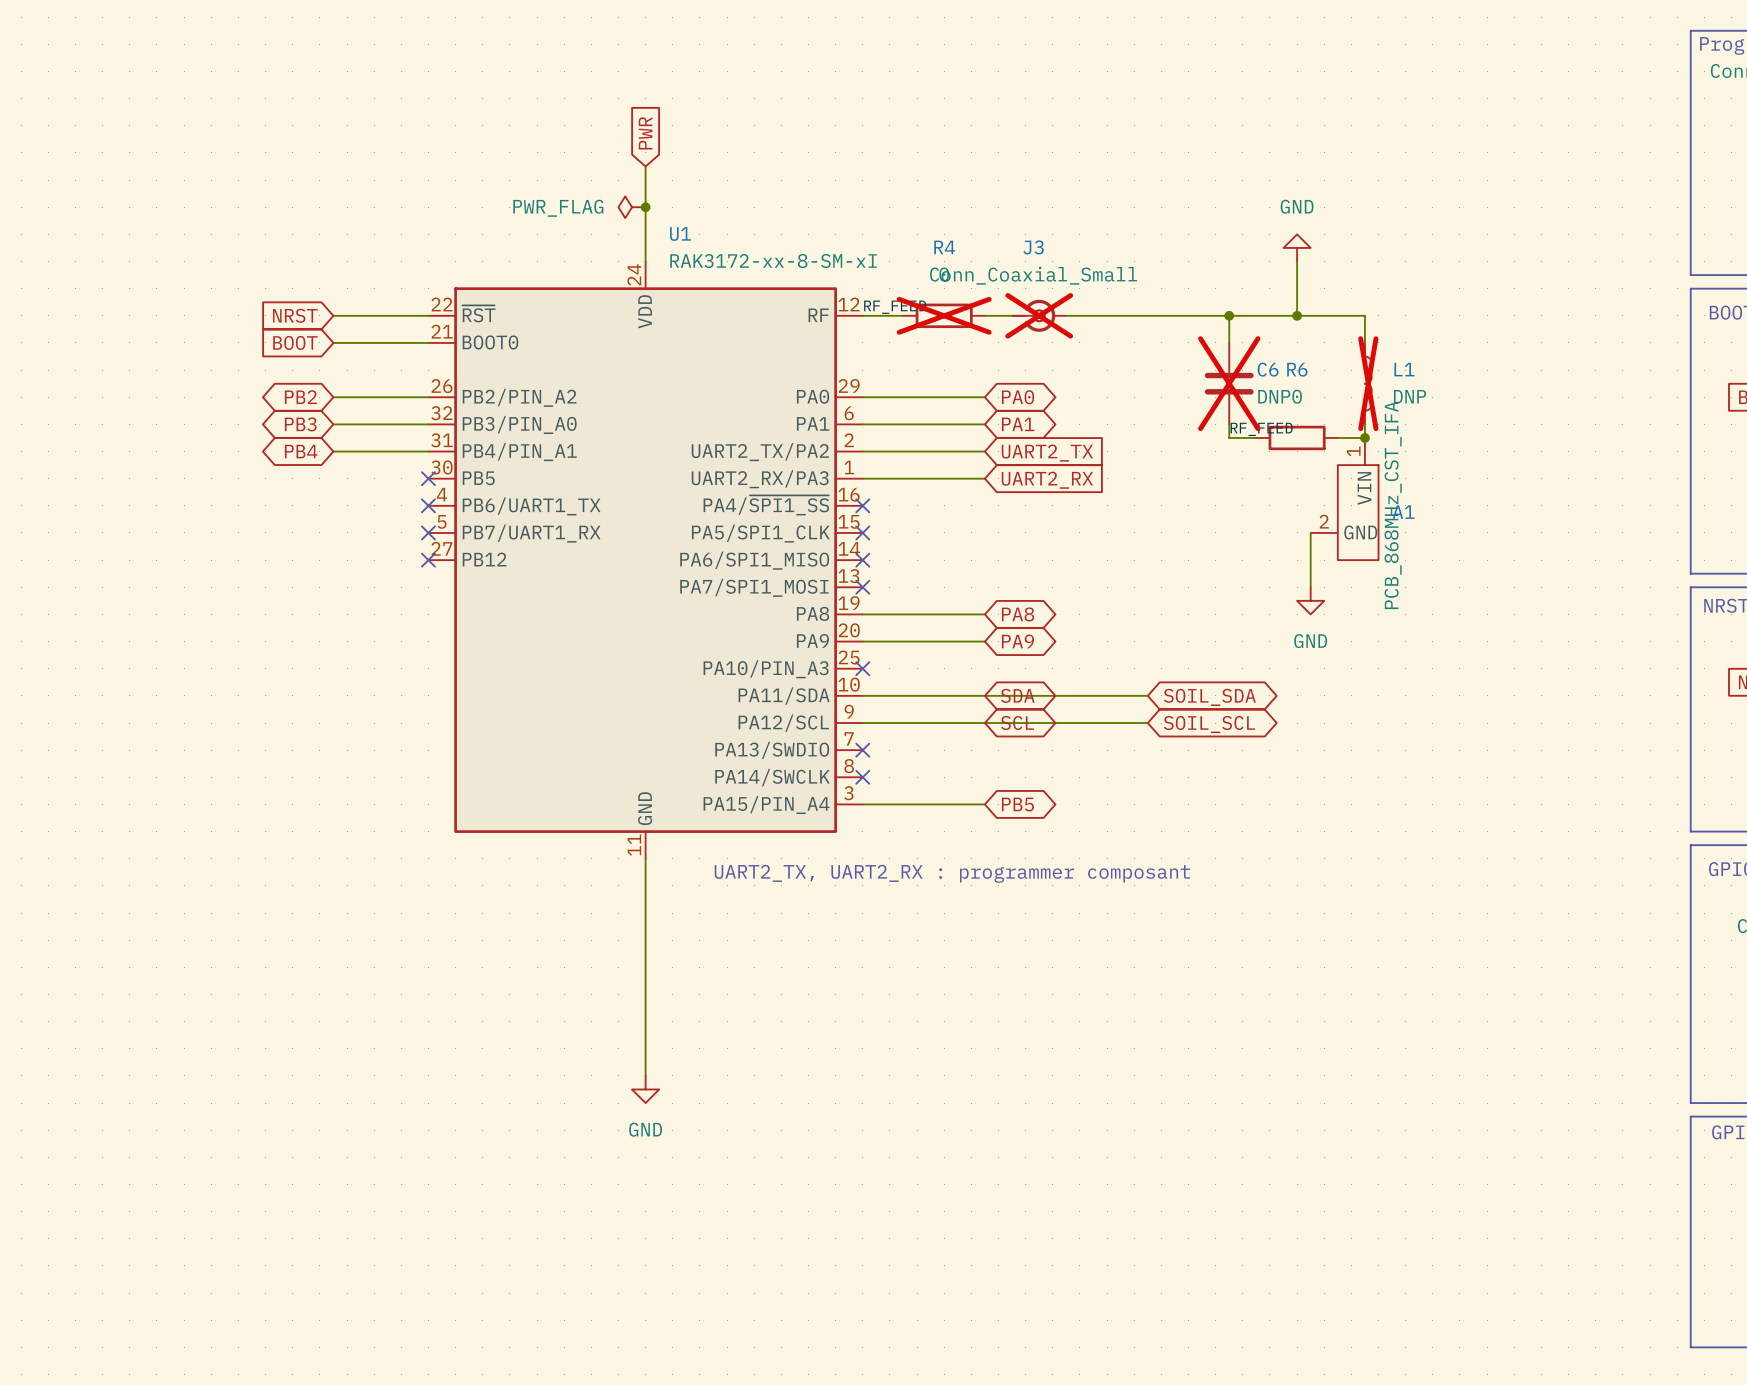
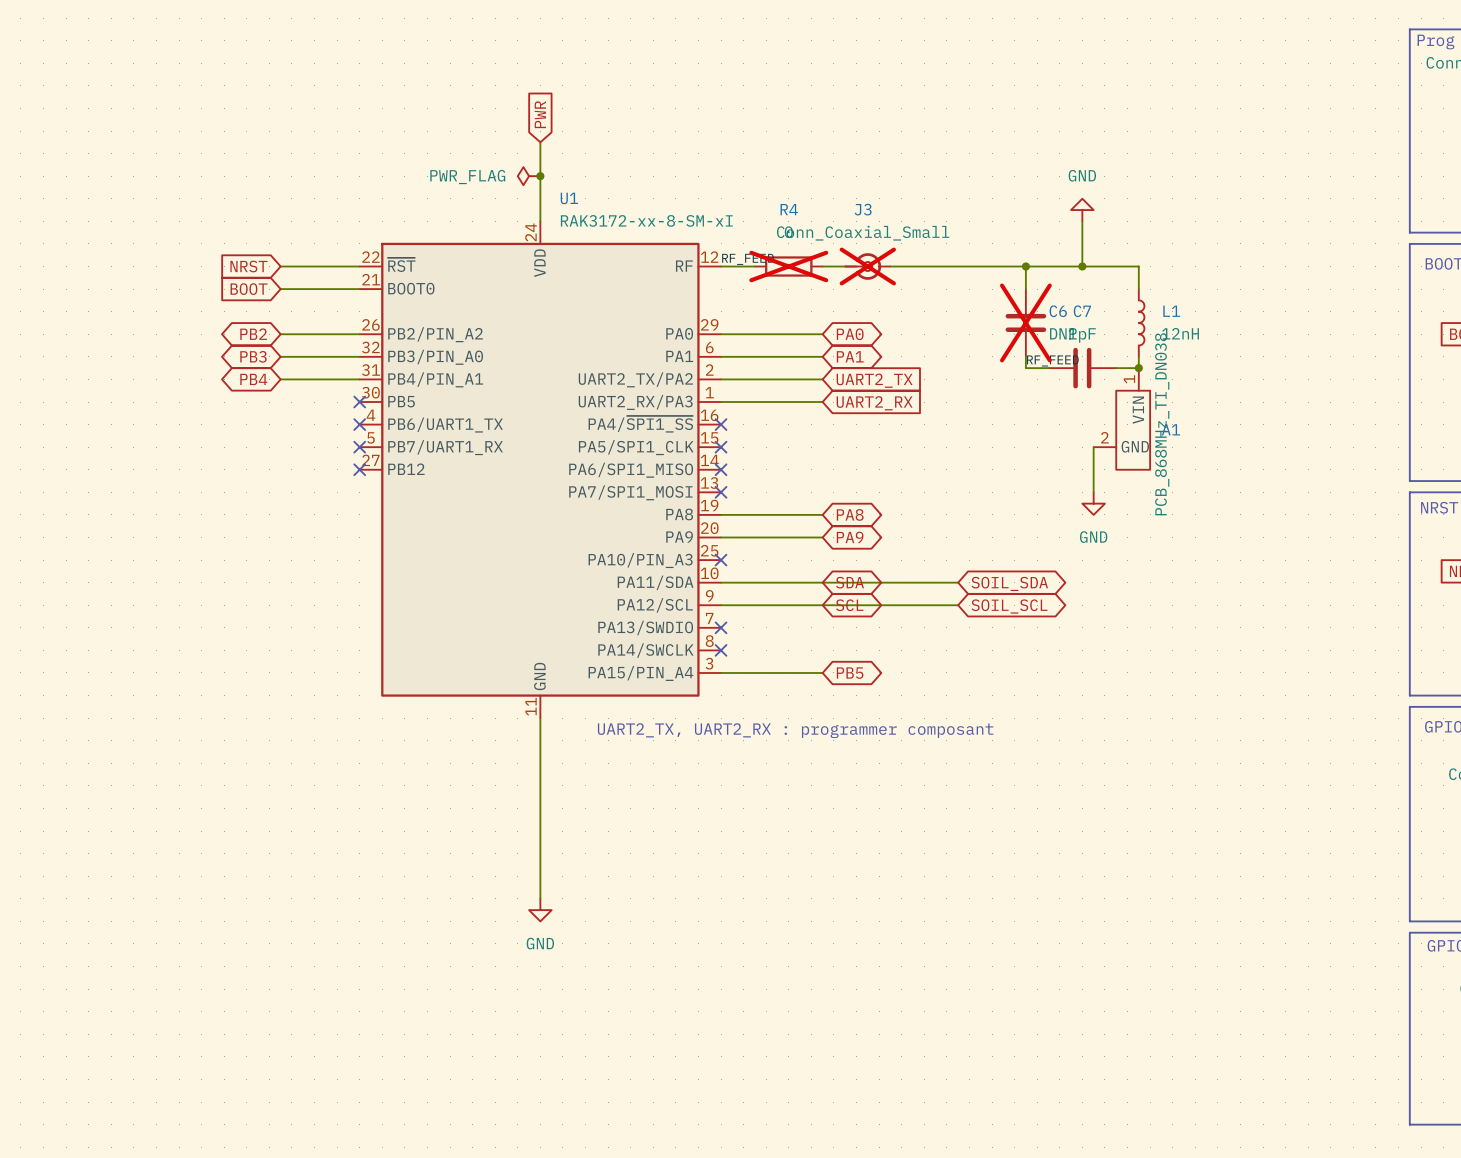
L1 do-not-place cross: (1368, 383) -> none
L1 value: DNP (1409, 396) -> 12nH (1180, 333)
R6: 0 (1297, 437) -> none
C7: none -> 1pF (1082, 368)
A1 value: PCB_868MHz_CST_IFA (1393, 505) -> PCB_868MHz_TI_DN038 (1162, 424)

